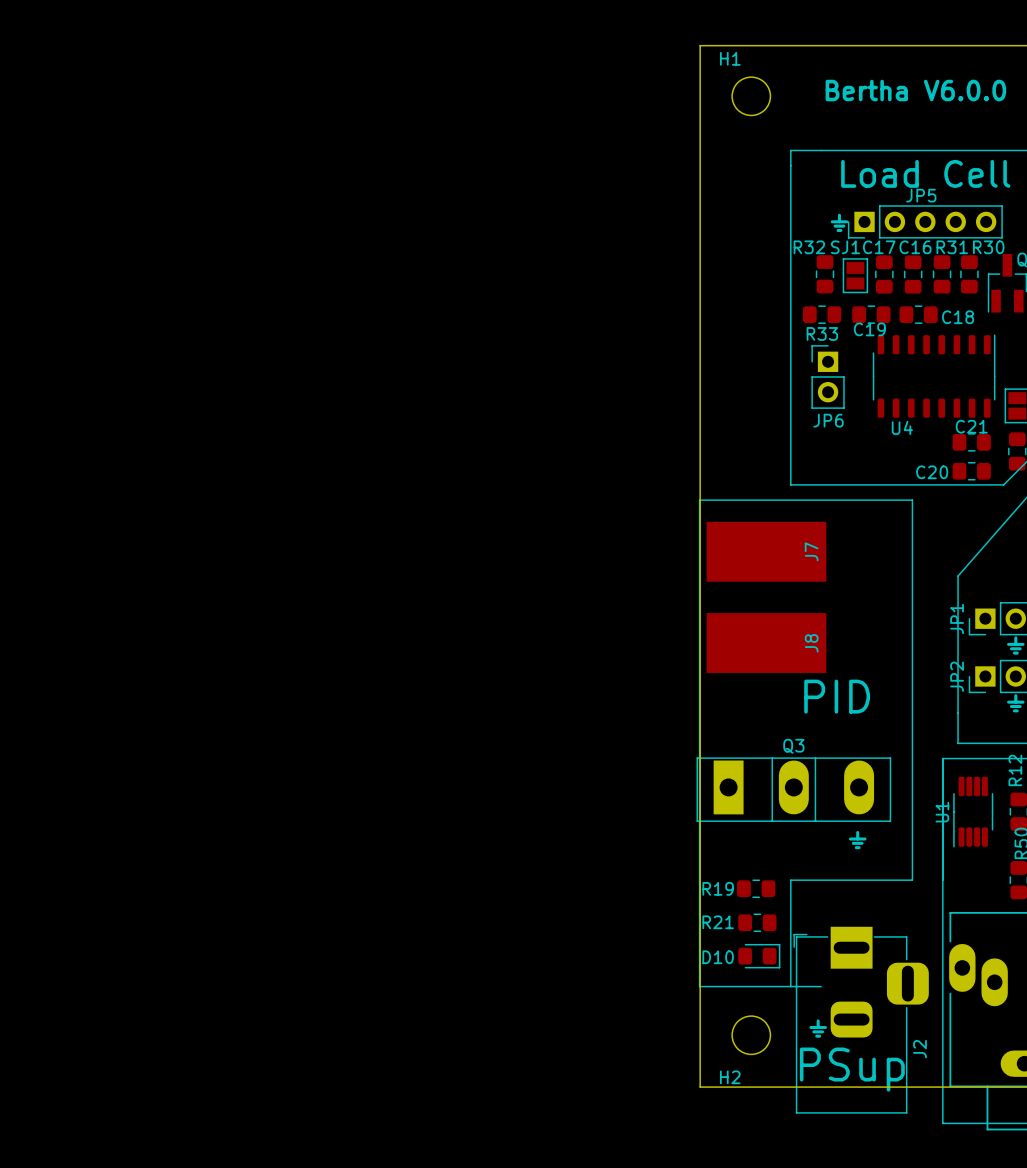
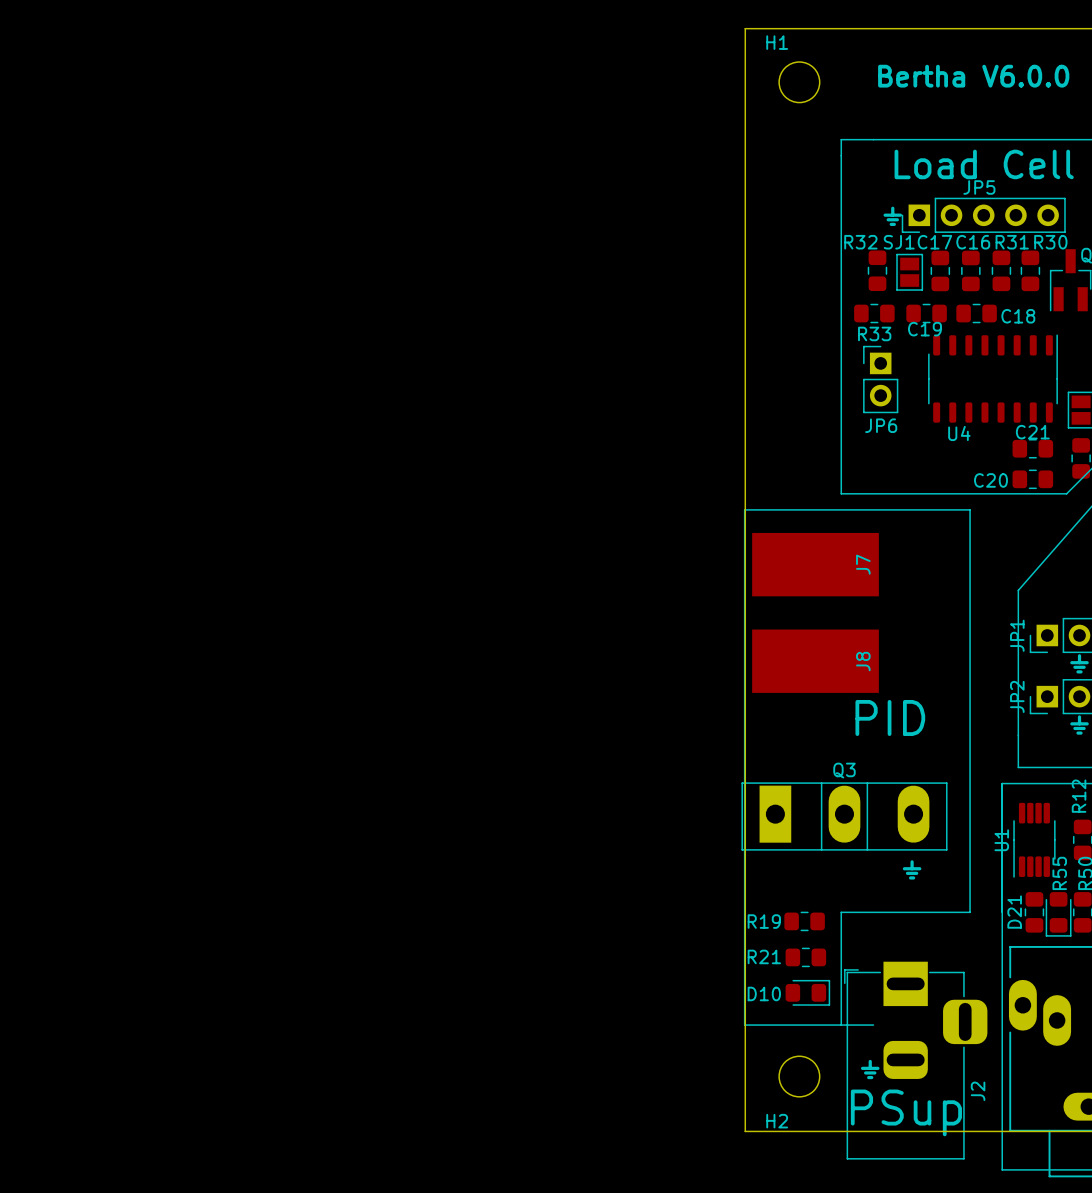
R55: none -> (1034, 912)
D21: none -> (1058, 914)

